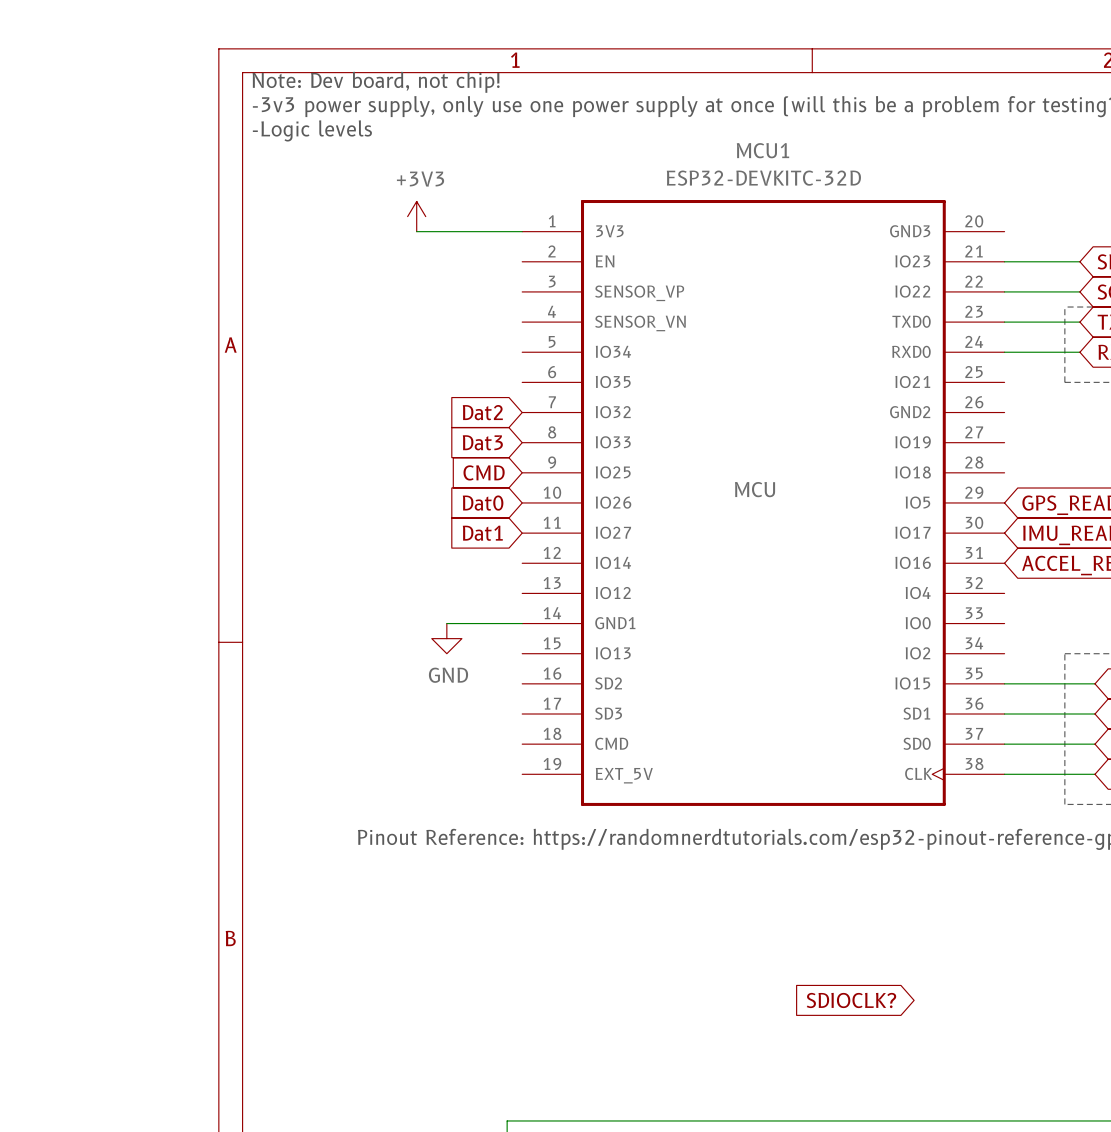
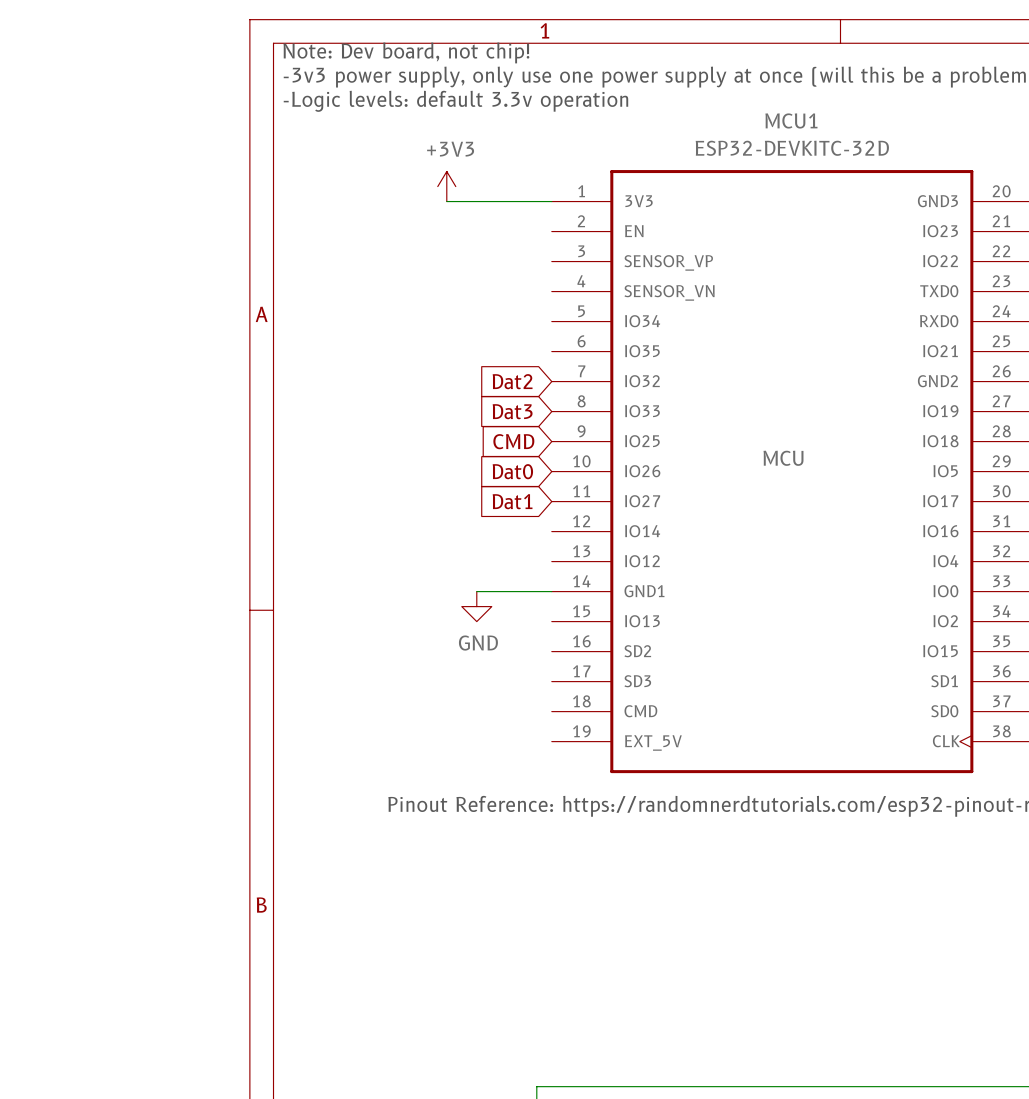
text: -Logic levels (312, 130) -> -Logic levels: default 3.3v operation (455, 101)
global label: SDIOCLK? (851, 1000) -> none

